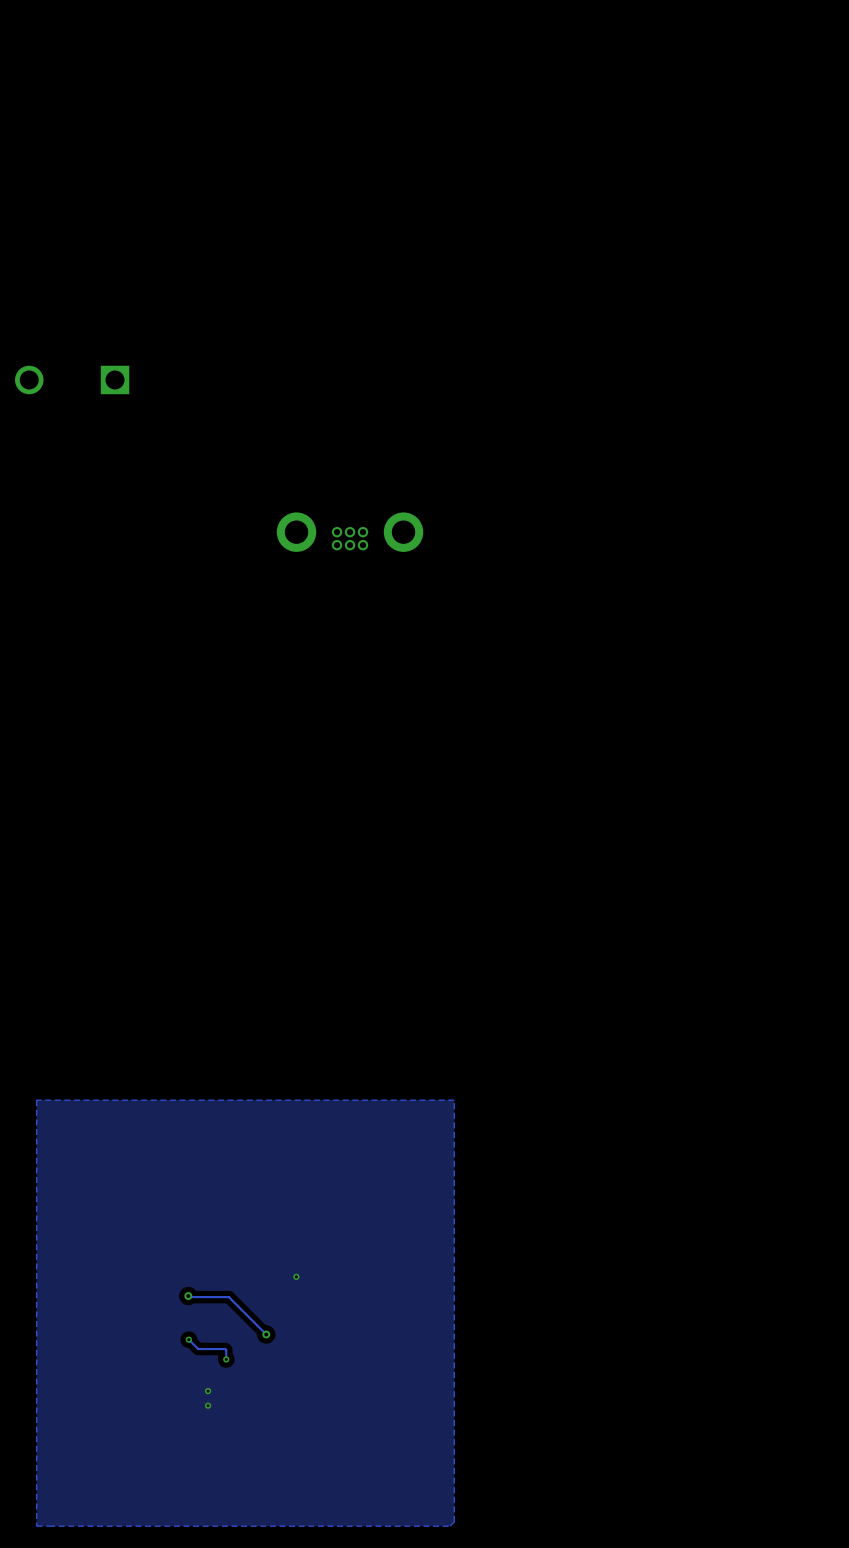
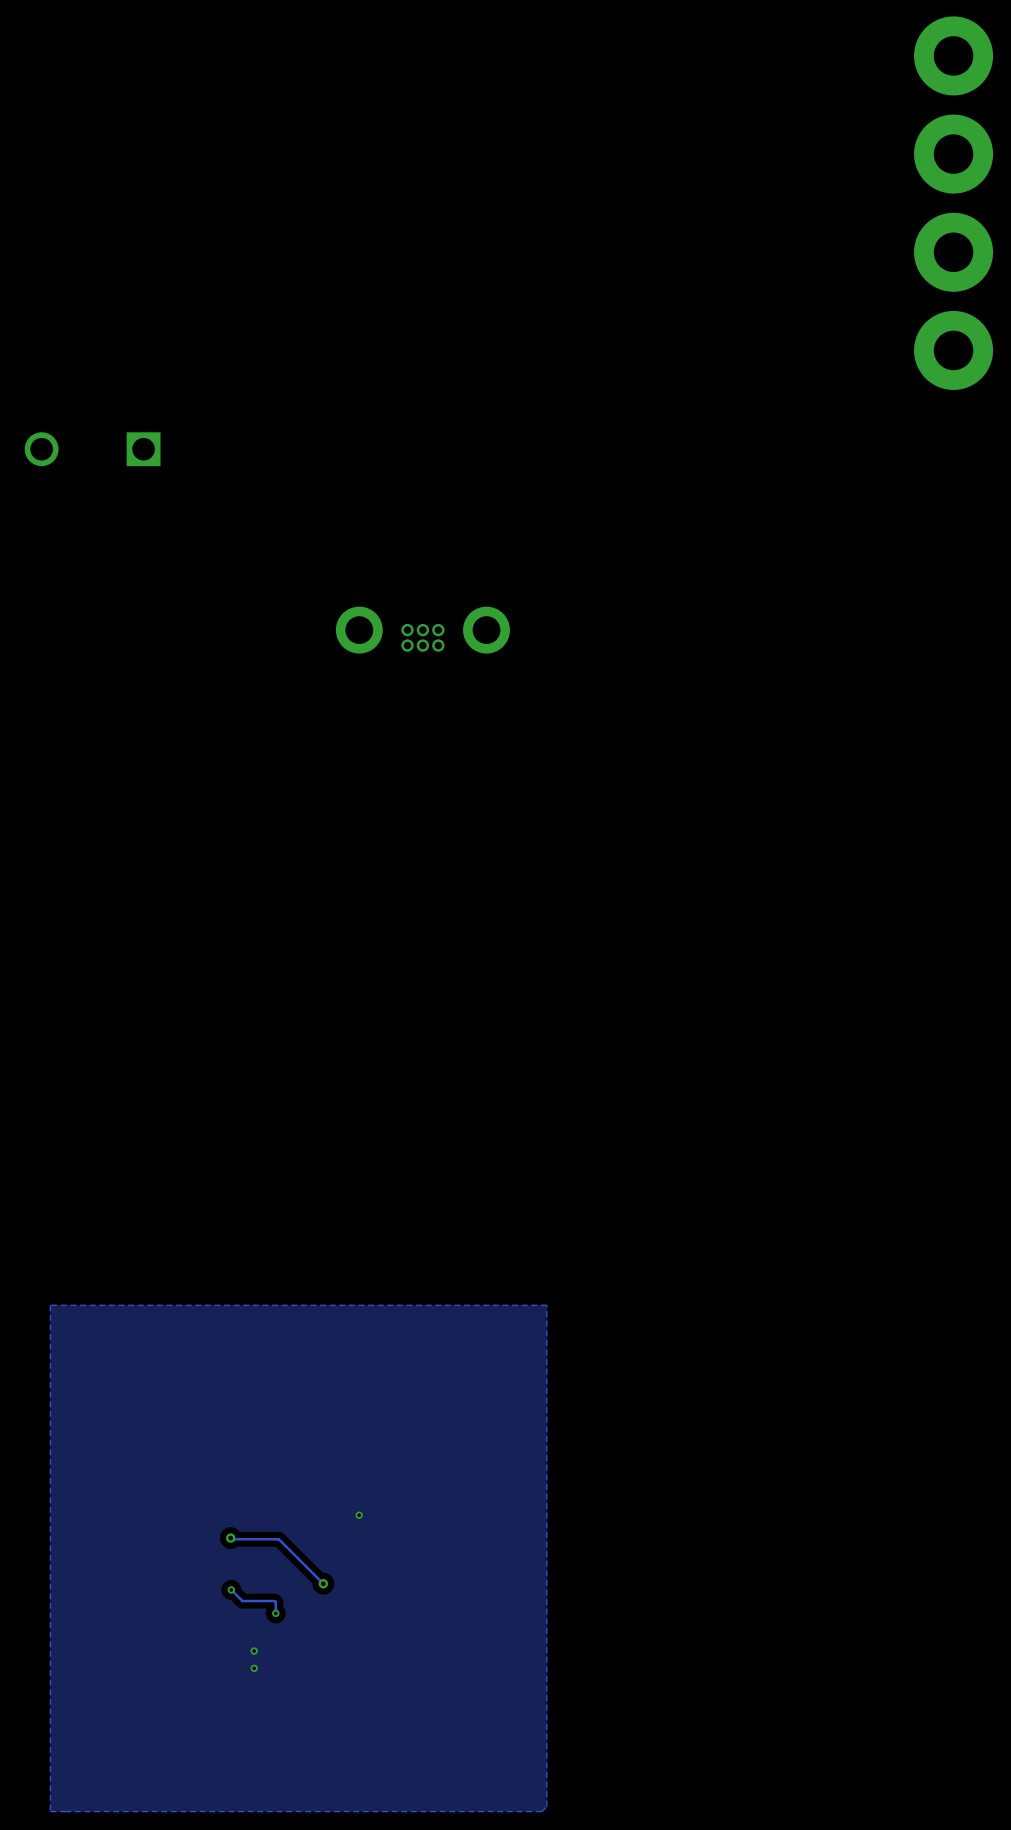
part: none -> (953, 55)
part: none -> (953, 154)
part: none -> (953, 252)
part: none -> (953, 350)

